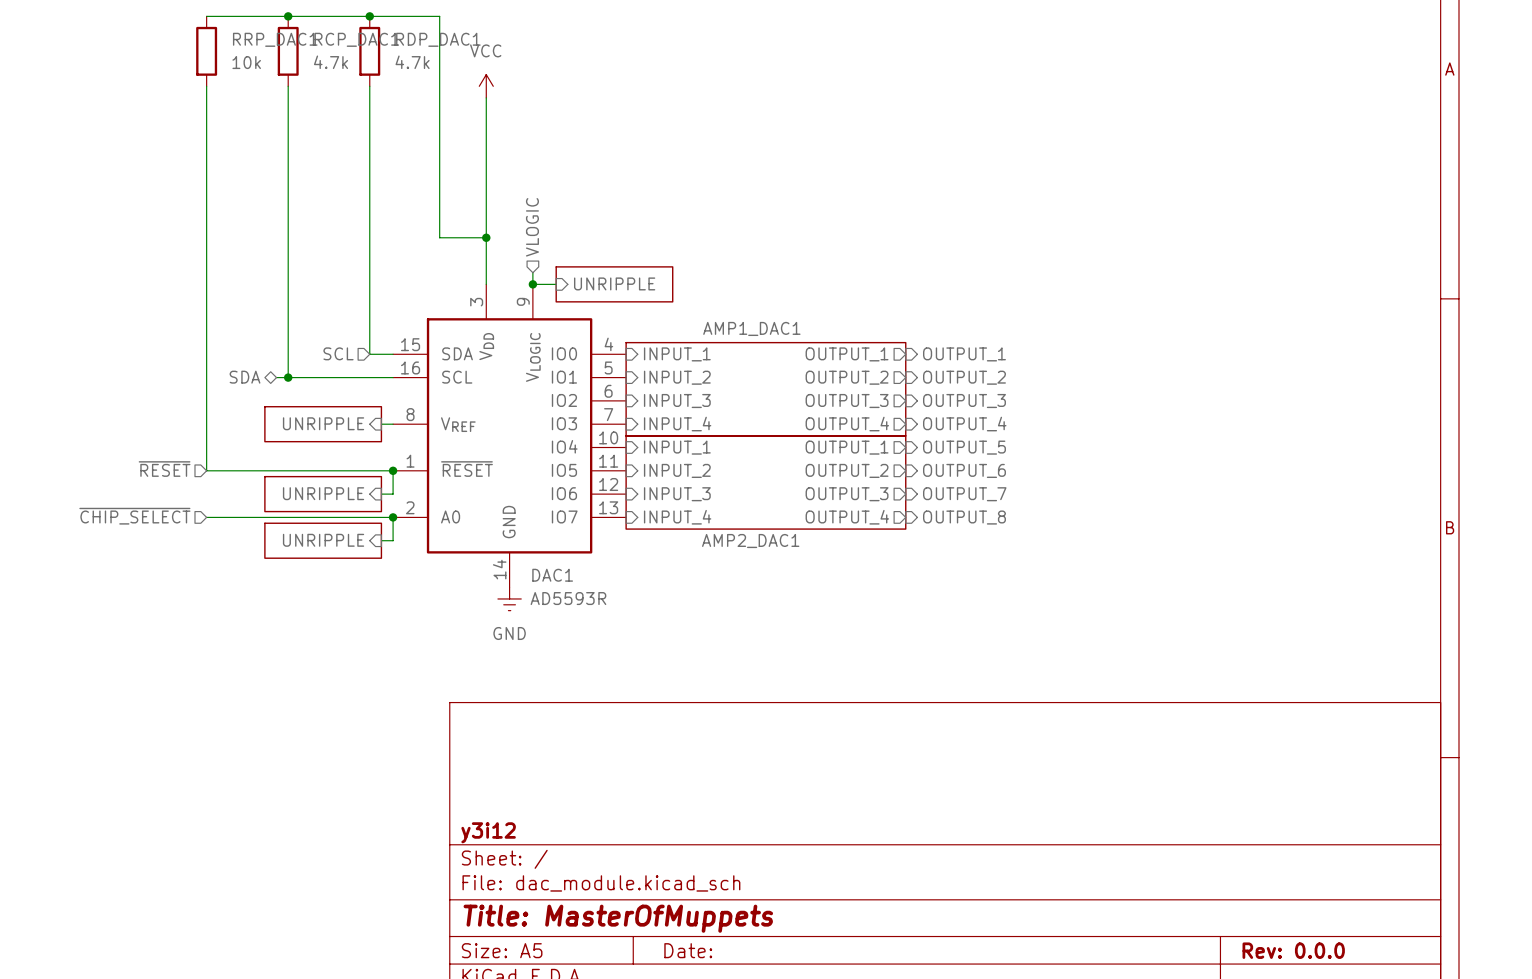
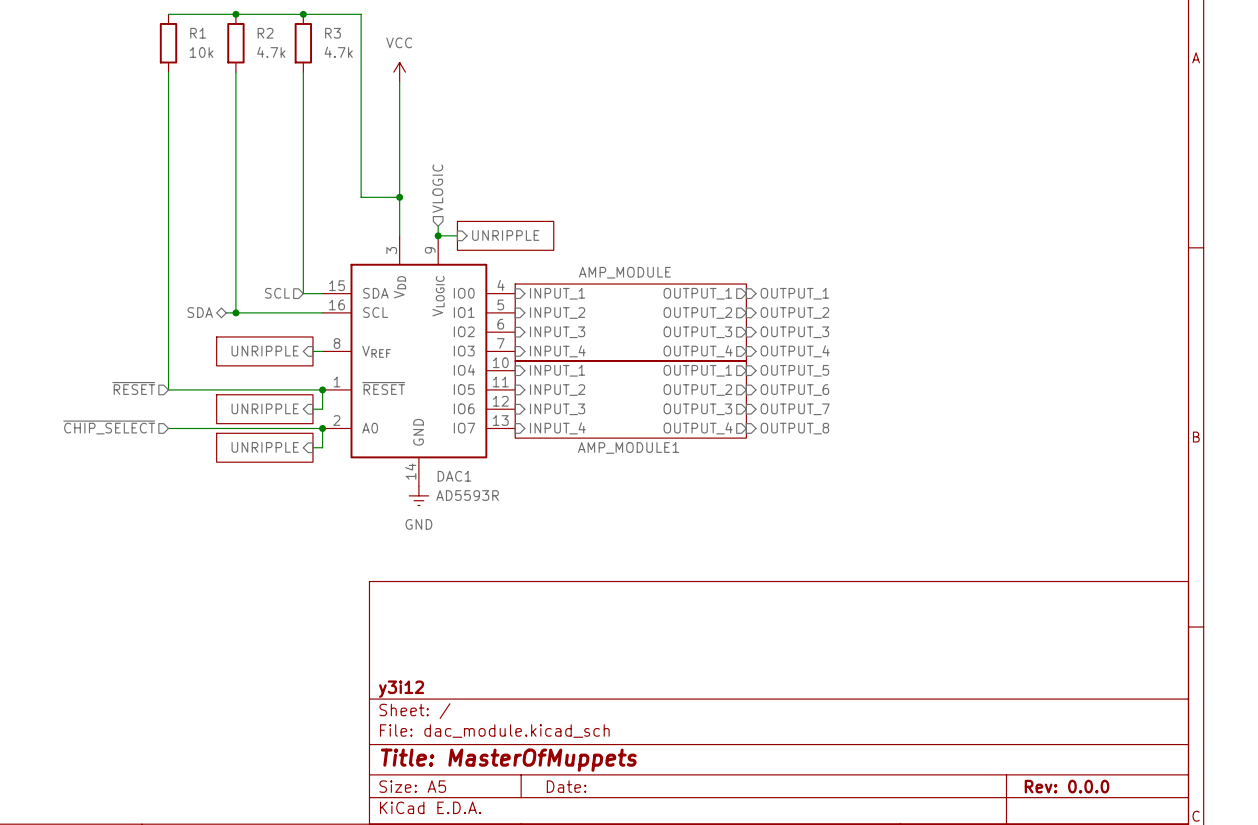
RRP_DAC1 name: RRP_DAC1 (275, 39) -> R1 (198, 33)
RCP_DAC1 name: RCP_DAC1 (356, 39) -> R2 (265, 33)
RDP_DAC1 name: RDP_DAC1 (438, 39) -> R3 (332, 33)
sheet AMP1_DAC1 name: AMP1_DAC1 (751, 328) -> AMP_MODULE (624, 272)
sheet AMP2_DAC1 name: AMP2_DAC1 (750, 541) -> AMP_MODULE1 (628, 447)

